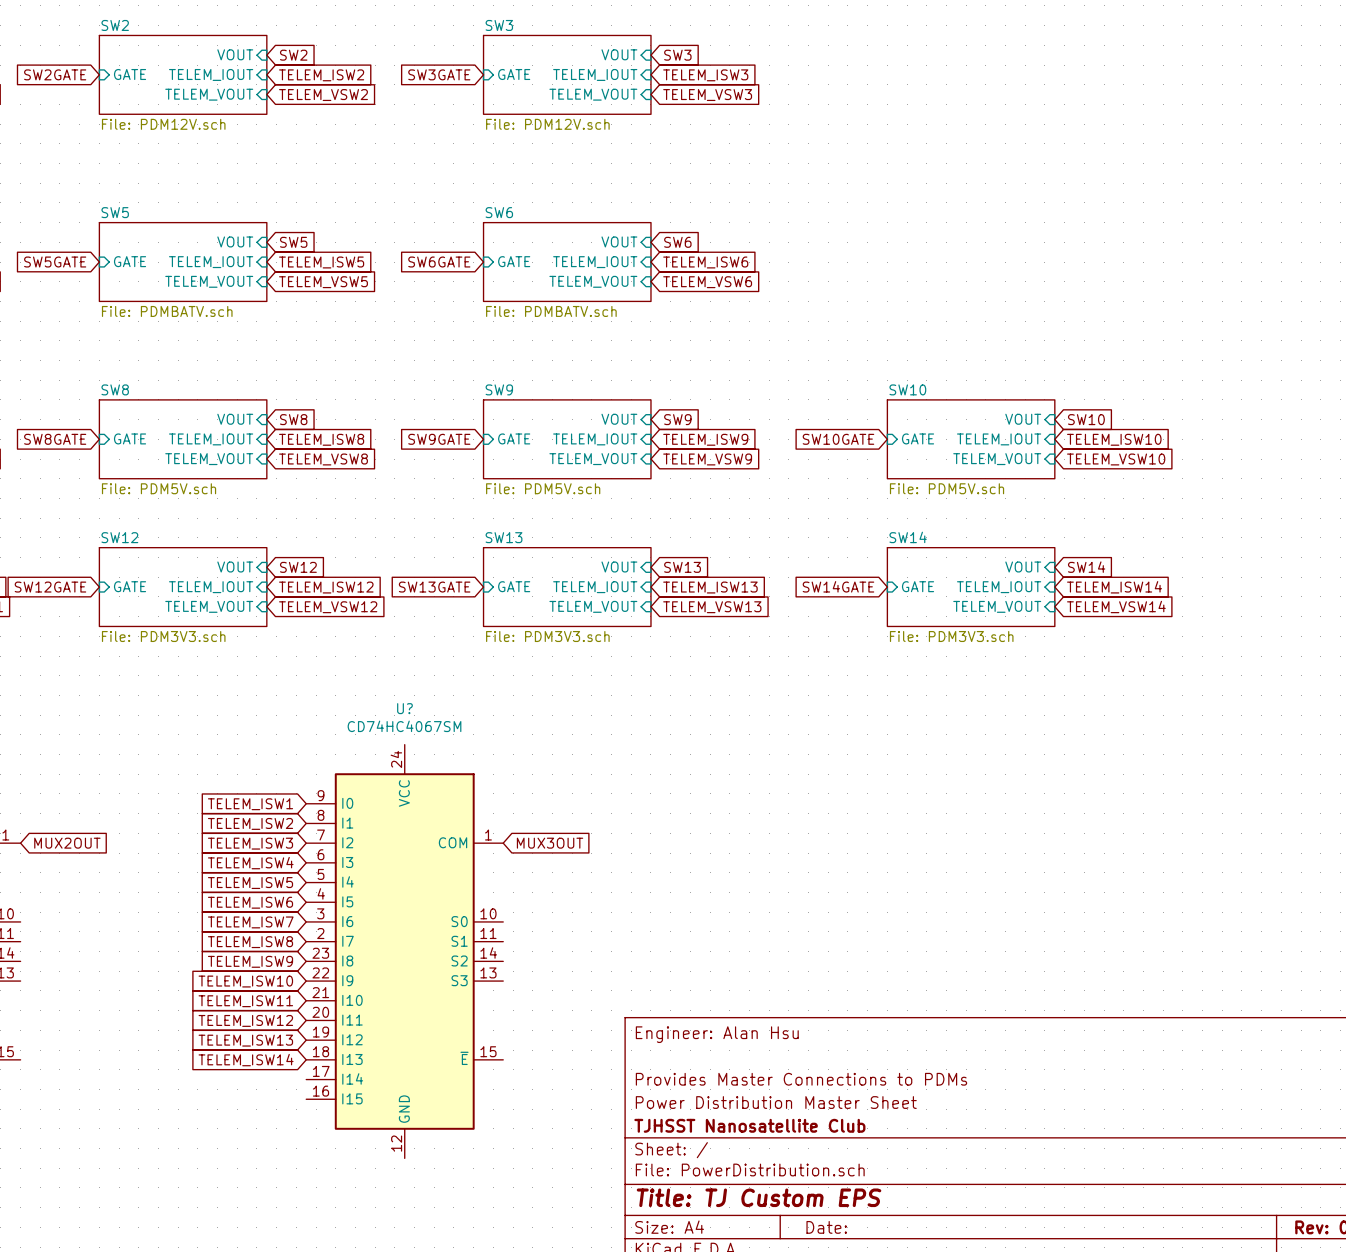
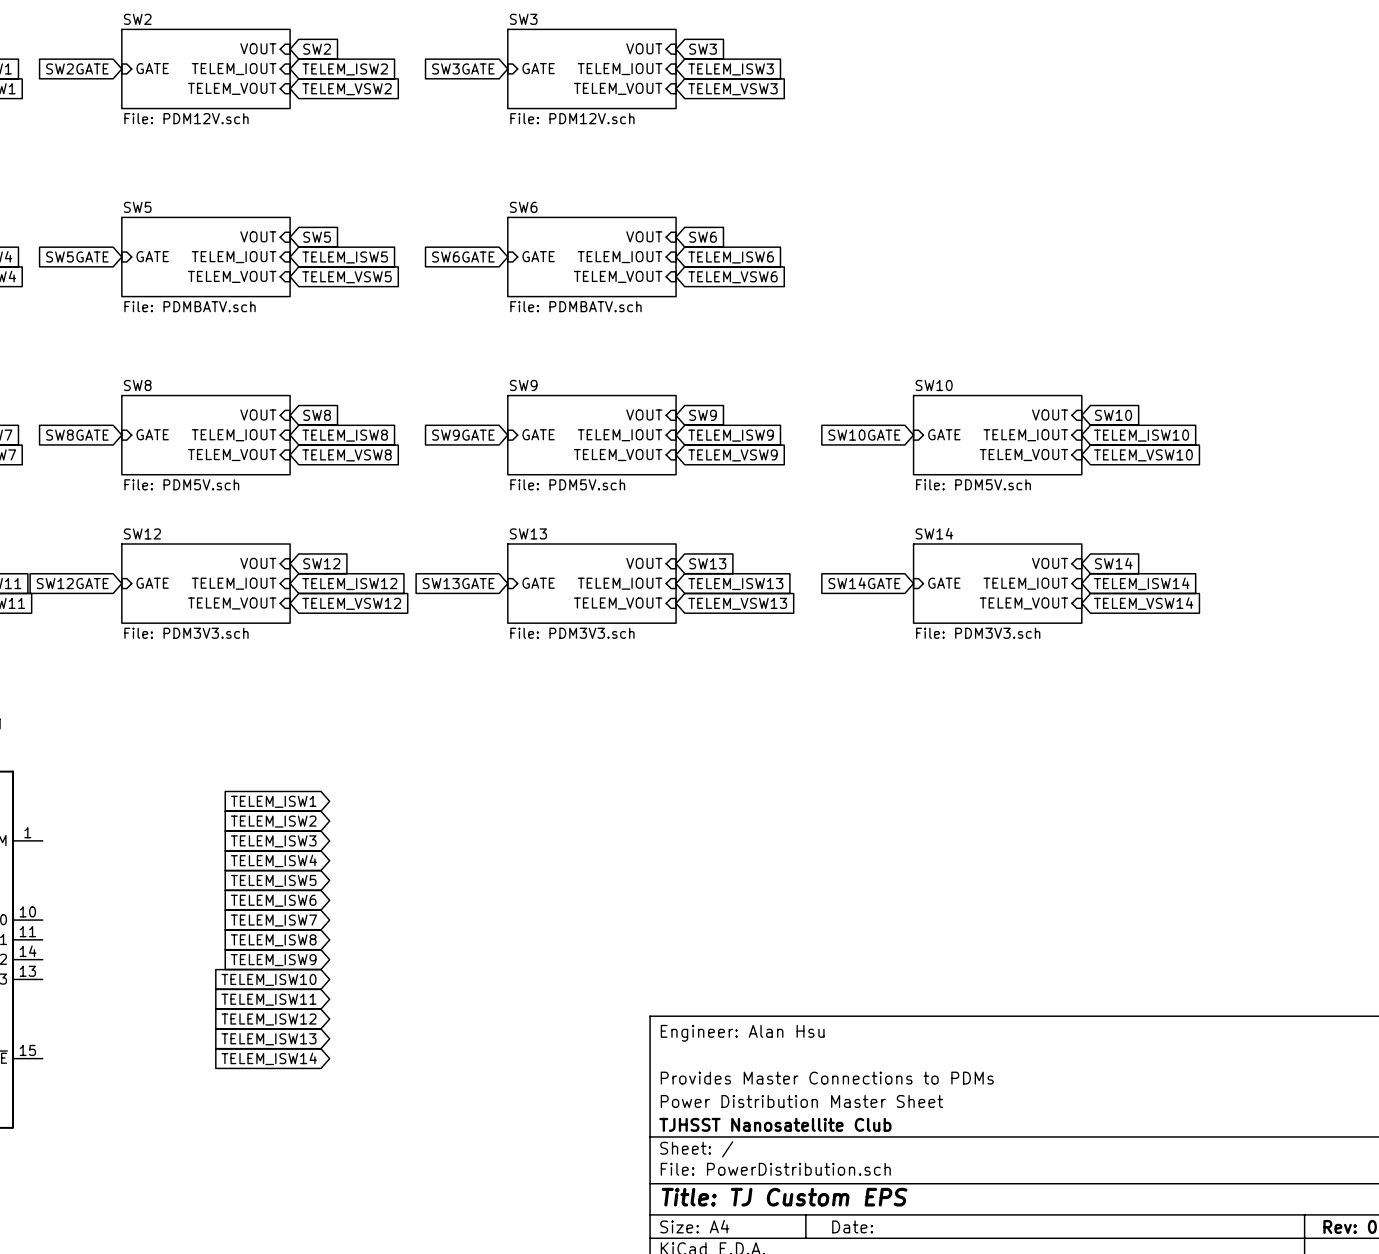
global label: MUX2OUT (67, 843) -> none
global label: MUX3OUT (550, 843) -> none
U?: CD74HC4067SM (404, 951) -> none

